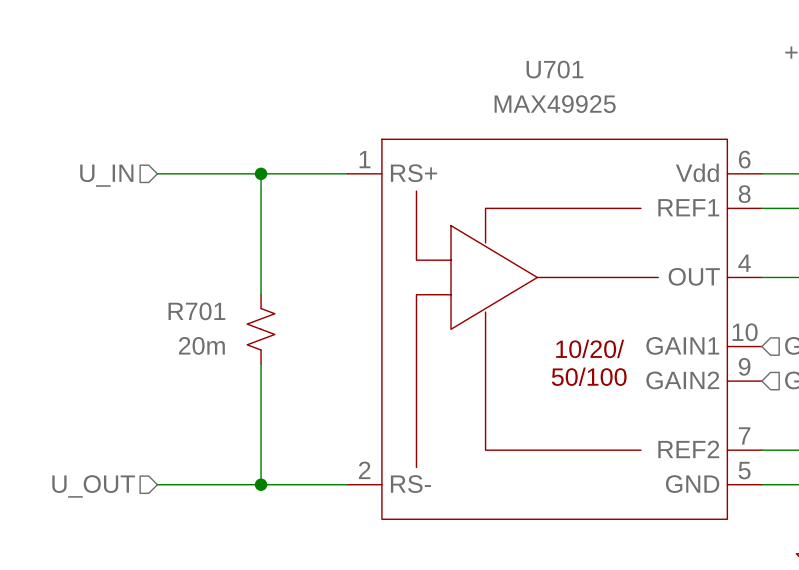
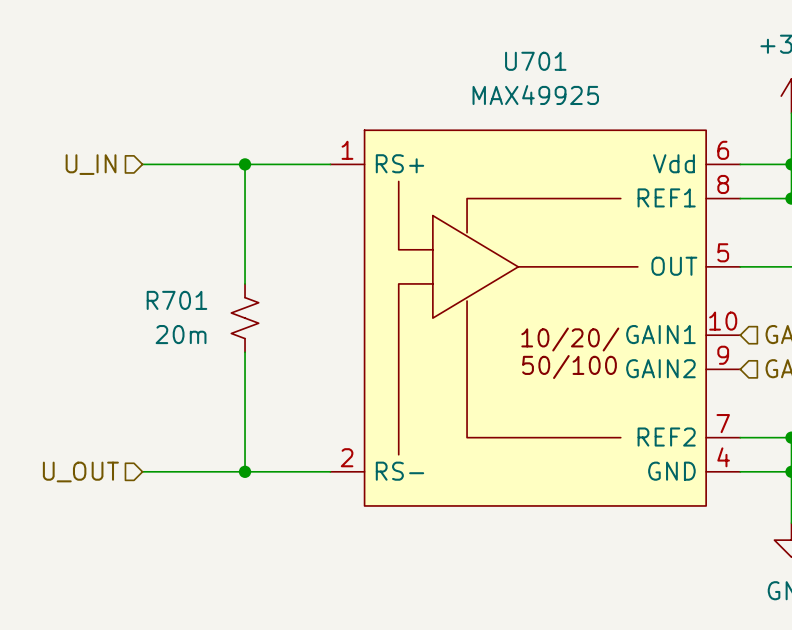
U701 pin number: 4 (744, 263) -> 5 (723, 252)
U701 pin number: 5 (744, 470) -> 4 (723, 457)

